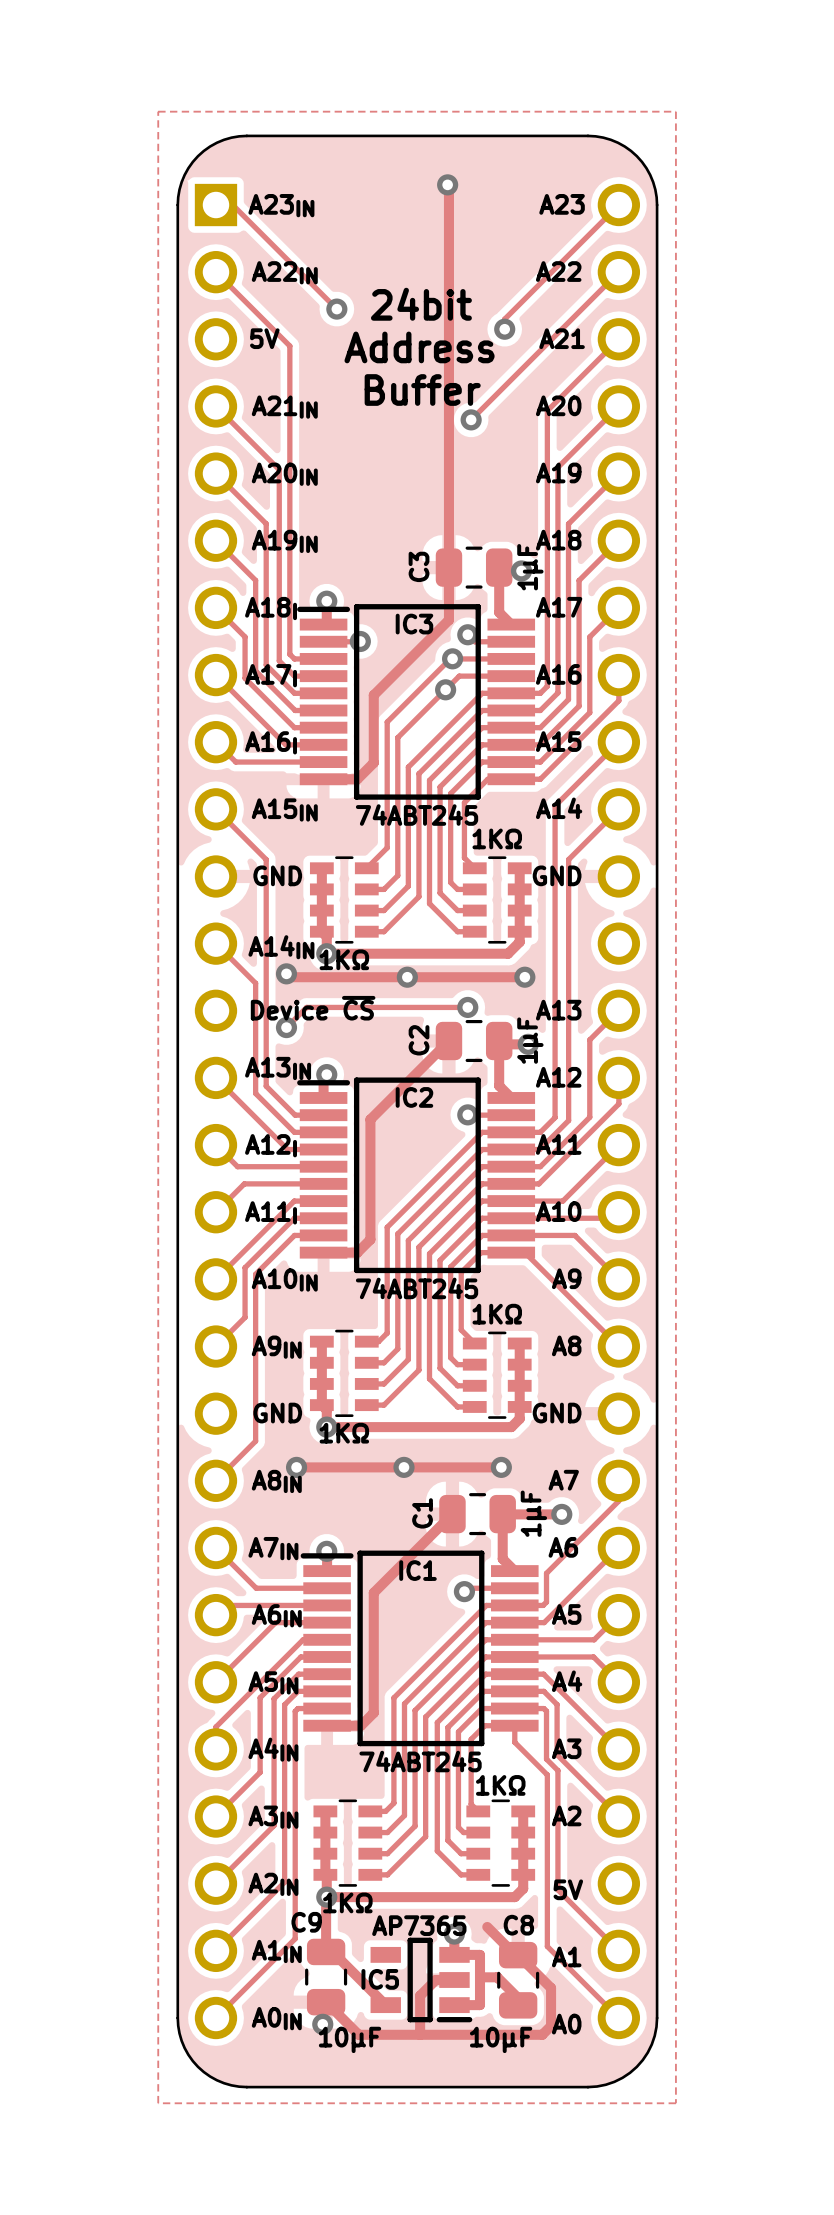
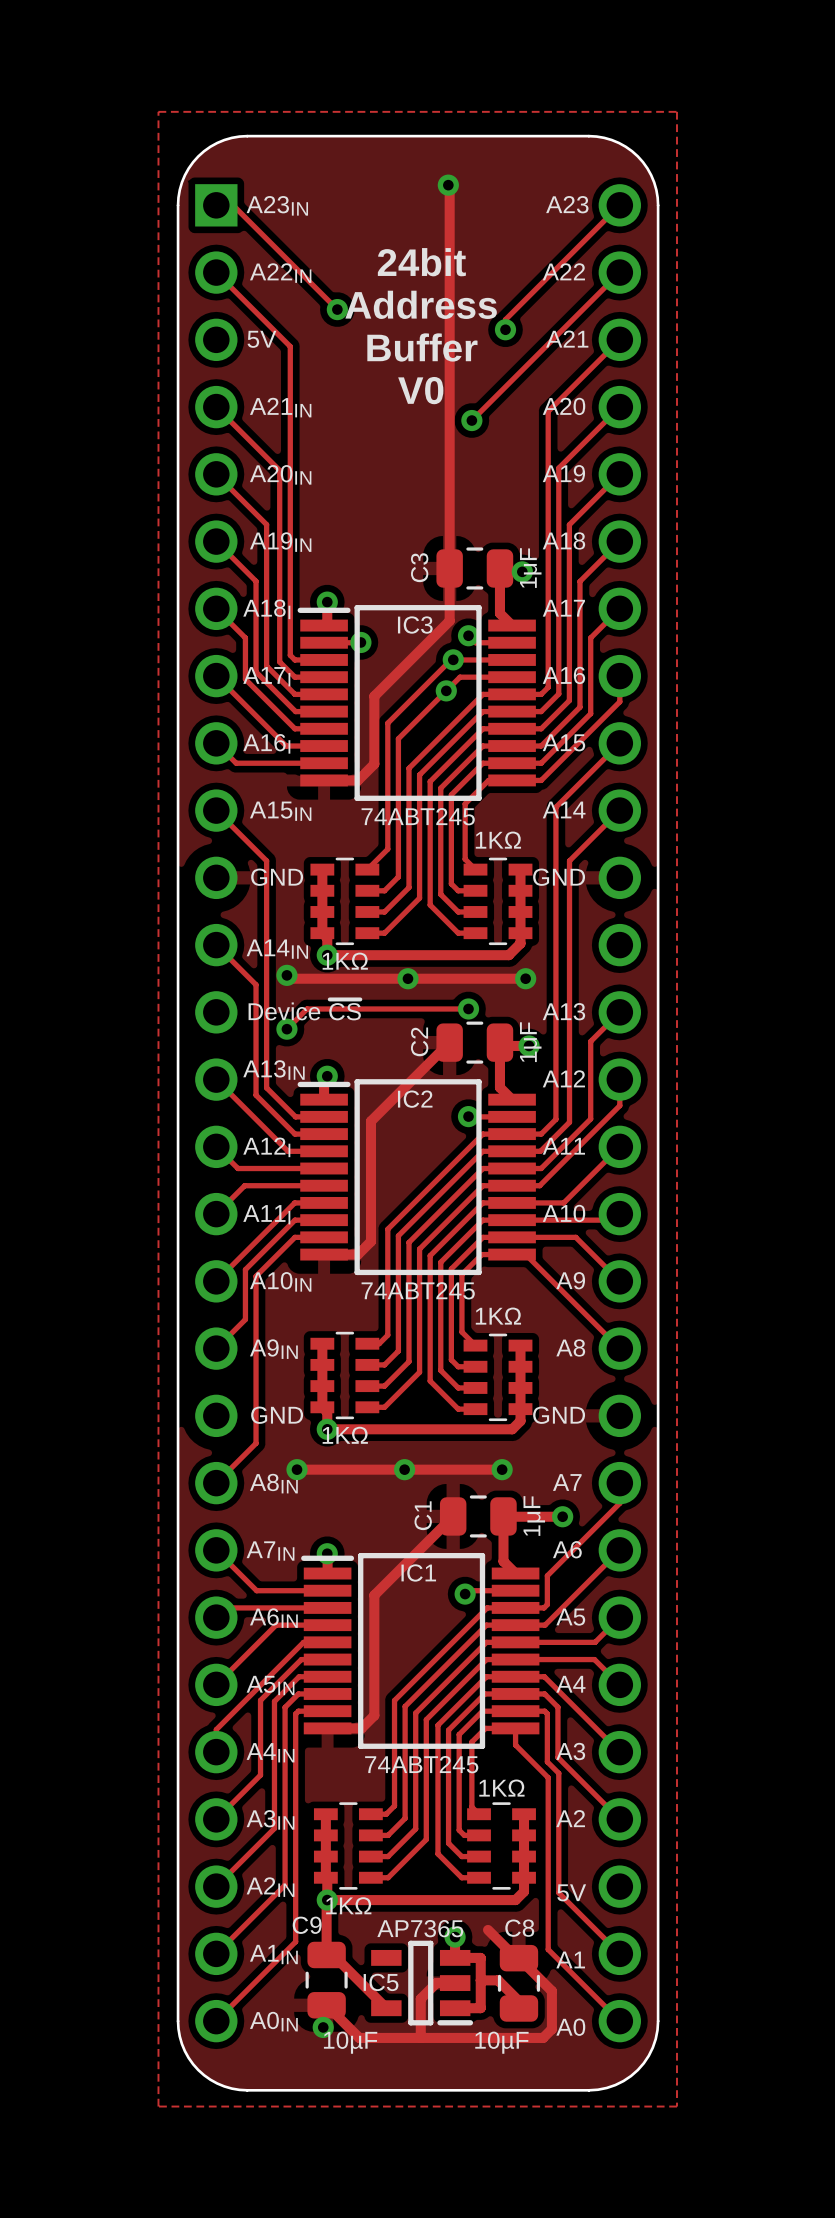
text: none -> 24bit (421, 262)
text: 24bit (421, 304) -> Address (421, 304)
text: Address (419, 347) -> Buffer (422, 347)
text: Buffer (422, 390) -> V0 (420, 390)

